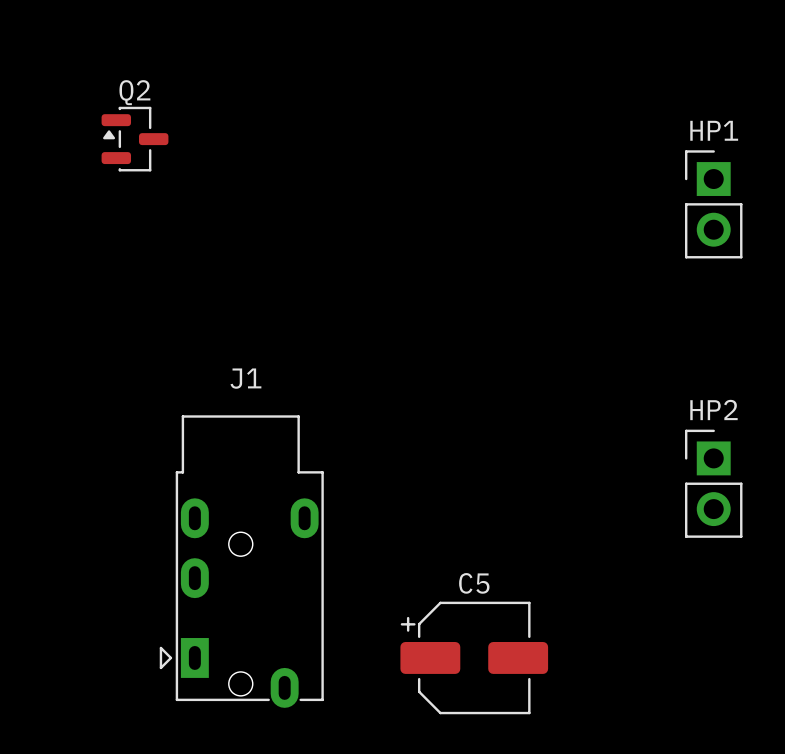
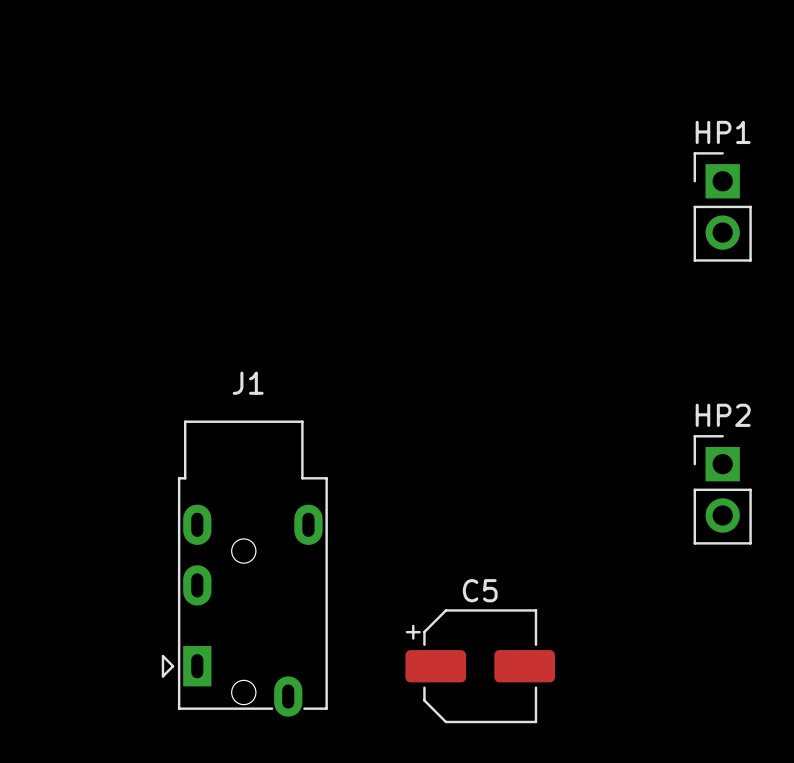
Q2: (135, 139) -> none

